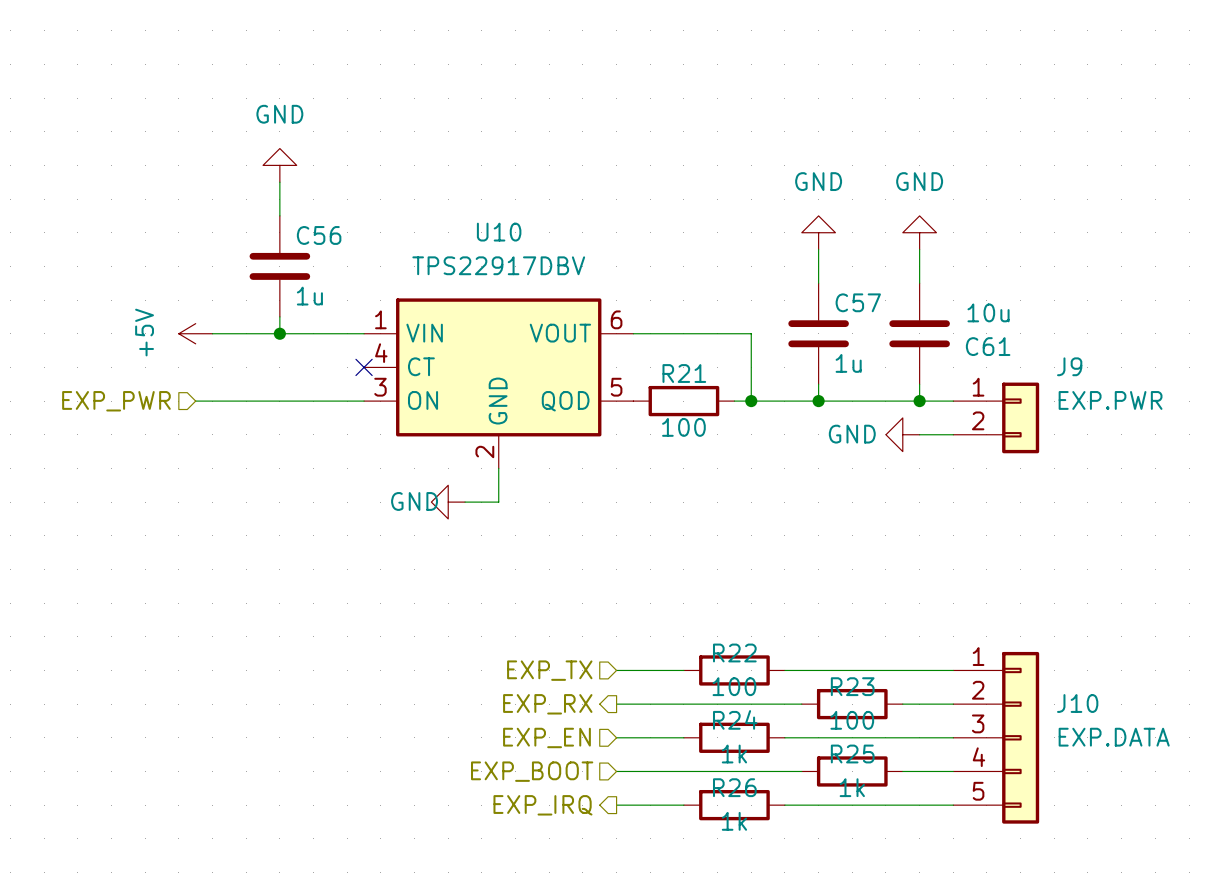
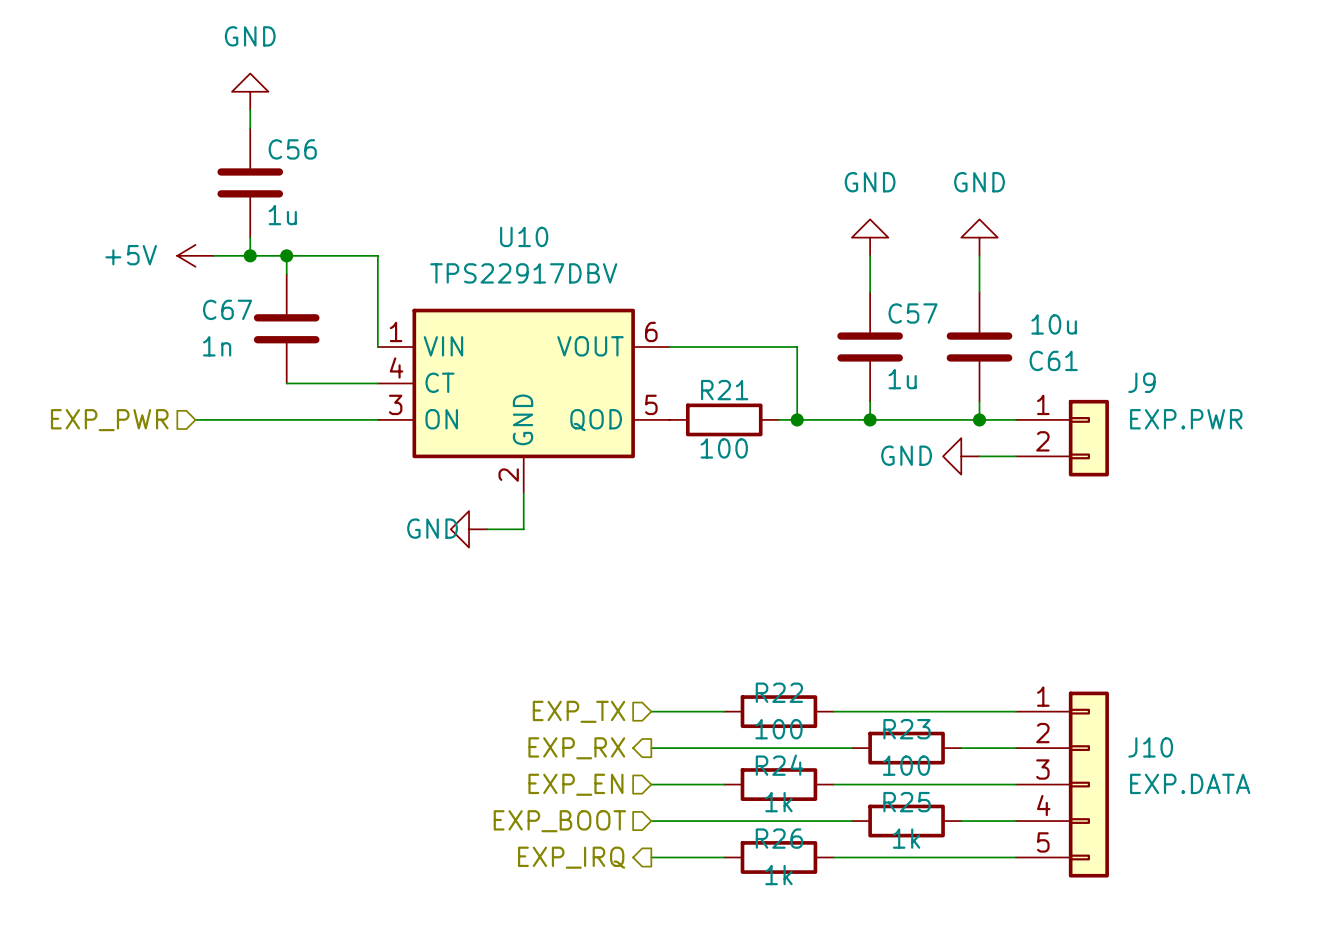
wire: none -> (250, 109) (250, 128)
power symbol position: GND (279, 165) -> GND (250, 91)
wire: (279, 182) (279, 215) -> none
wire: none -> (250, 237) (250, 255)
junction: none -> (250, 255)
junction: none -> (286, 255)
C56 position: (279, 266) -> (250, 182)
C67: none -> 1n (286, 328)
power symbol text rotation: 0° (144, 332) -> 90° clockwise (131, 255)
power symbol position: +5V (195, 333) -> +5V (195, 255)
wire: (212, 333) (364, 333) -> (213, 255) (377, 255) (377, 347)
junction: (279, 333) -> none
wire: none -> (286, 383) (377, 383)
no-connect mark: (364, 367) -> none

